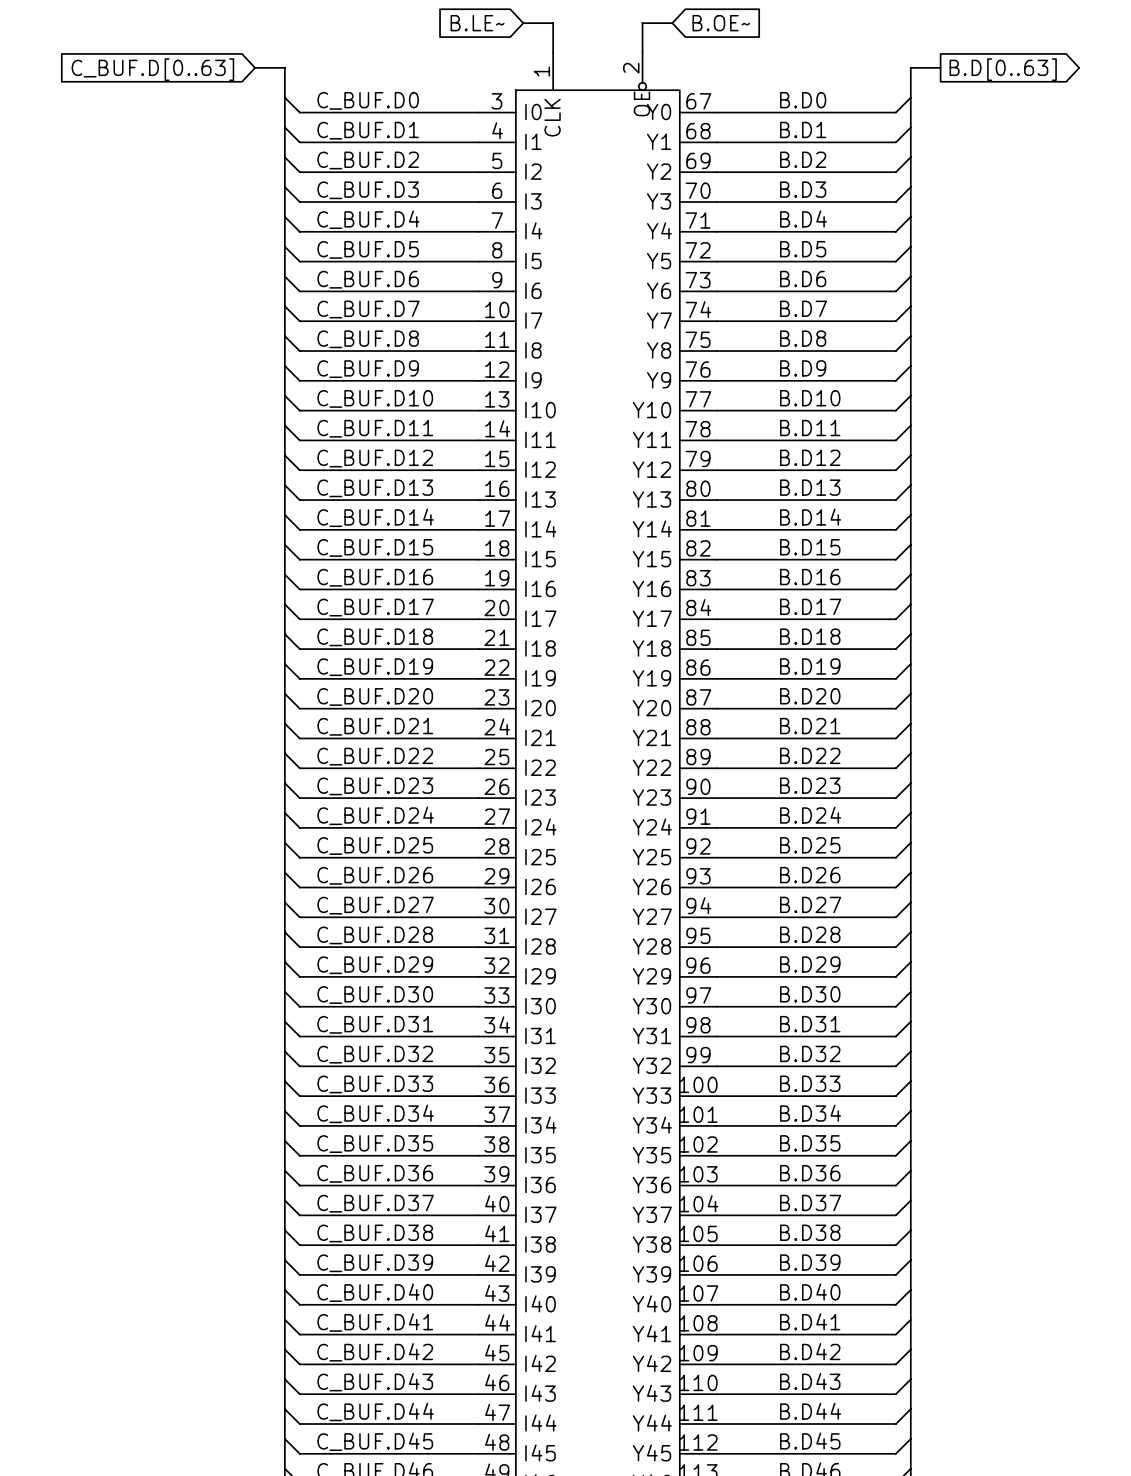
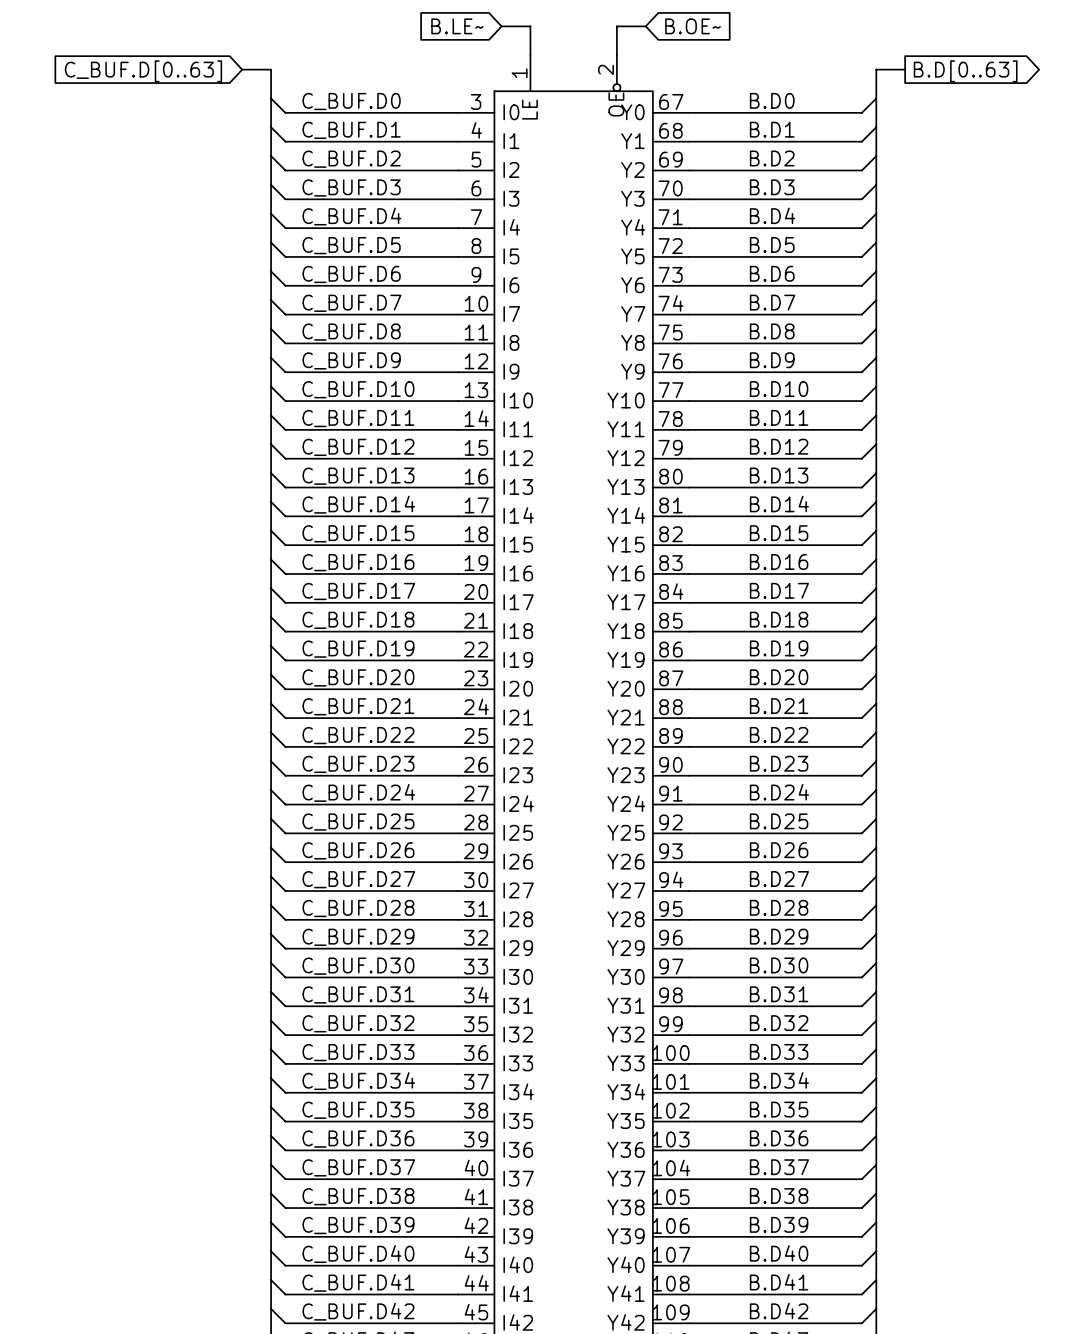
part pin name: CLK (552, 117) -> LE (529, 109)

